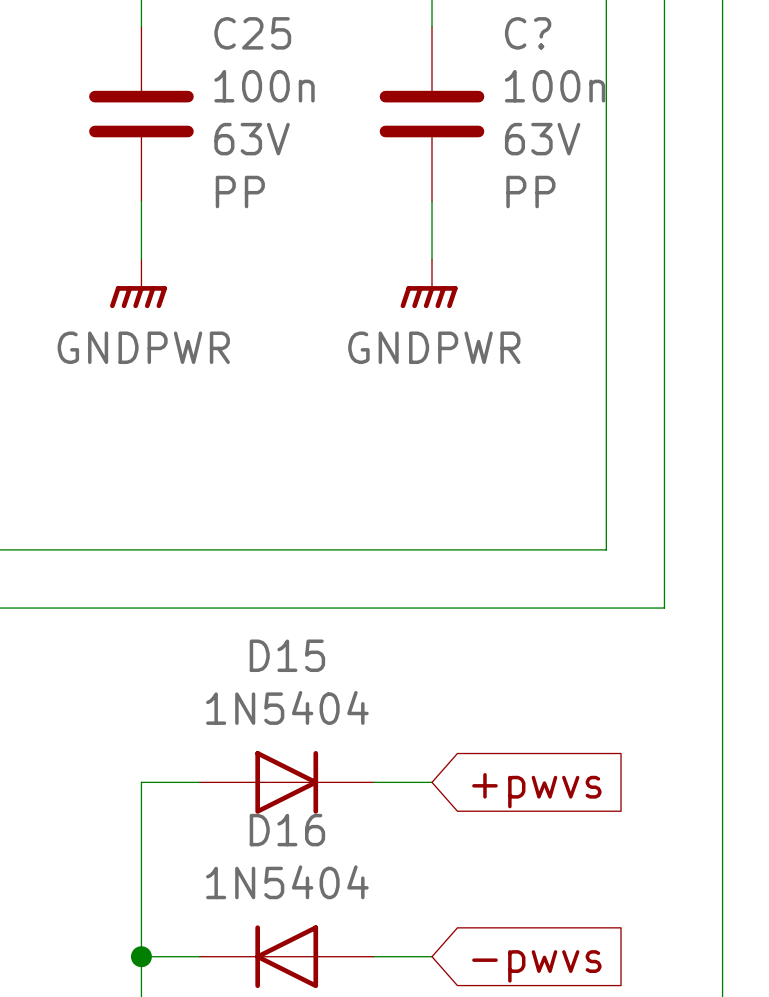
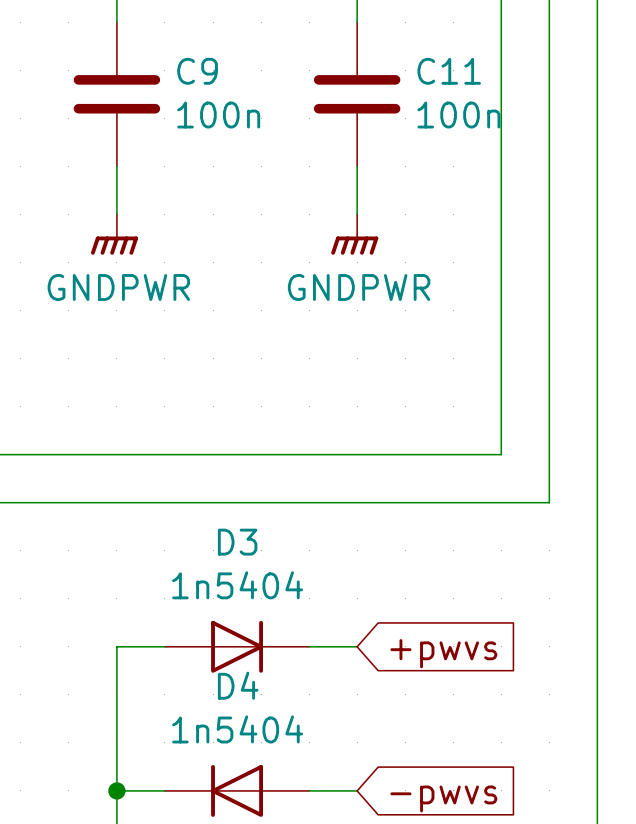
C25 name: C25 (252, 33) -> C9 (197, 71)
C? name: C? (528, 33) -> C11 (449, 71)
C25 value position: 100n (264, 86) -> 100n (218, 115)
C? value position: 100n (555, 86) -> 100n (458, 115)
C25 text: 63V (252, 139) -> none
C? text: 63V (542, 139) -> none
C25 text: PP (240, 192) -> none
C? text: PP (530, 192) -> none
D15 name: D15 (287, 655) -> D3 (237, 542)
D15 value: 1N5404 (287, 707) -> 1n5404 (237, 585)
D16 name: D16 (287, 830) -> D4 (238, 685)
D16 value: 1N5404 (287, 882) -> 1n5404 (237, 729)

